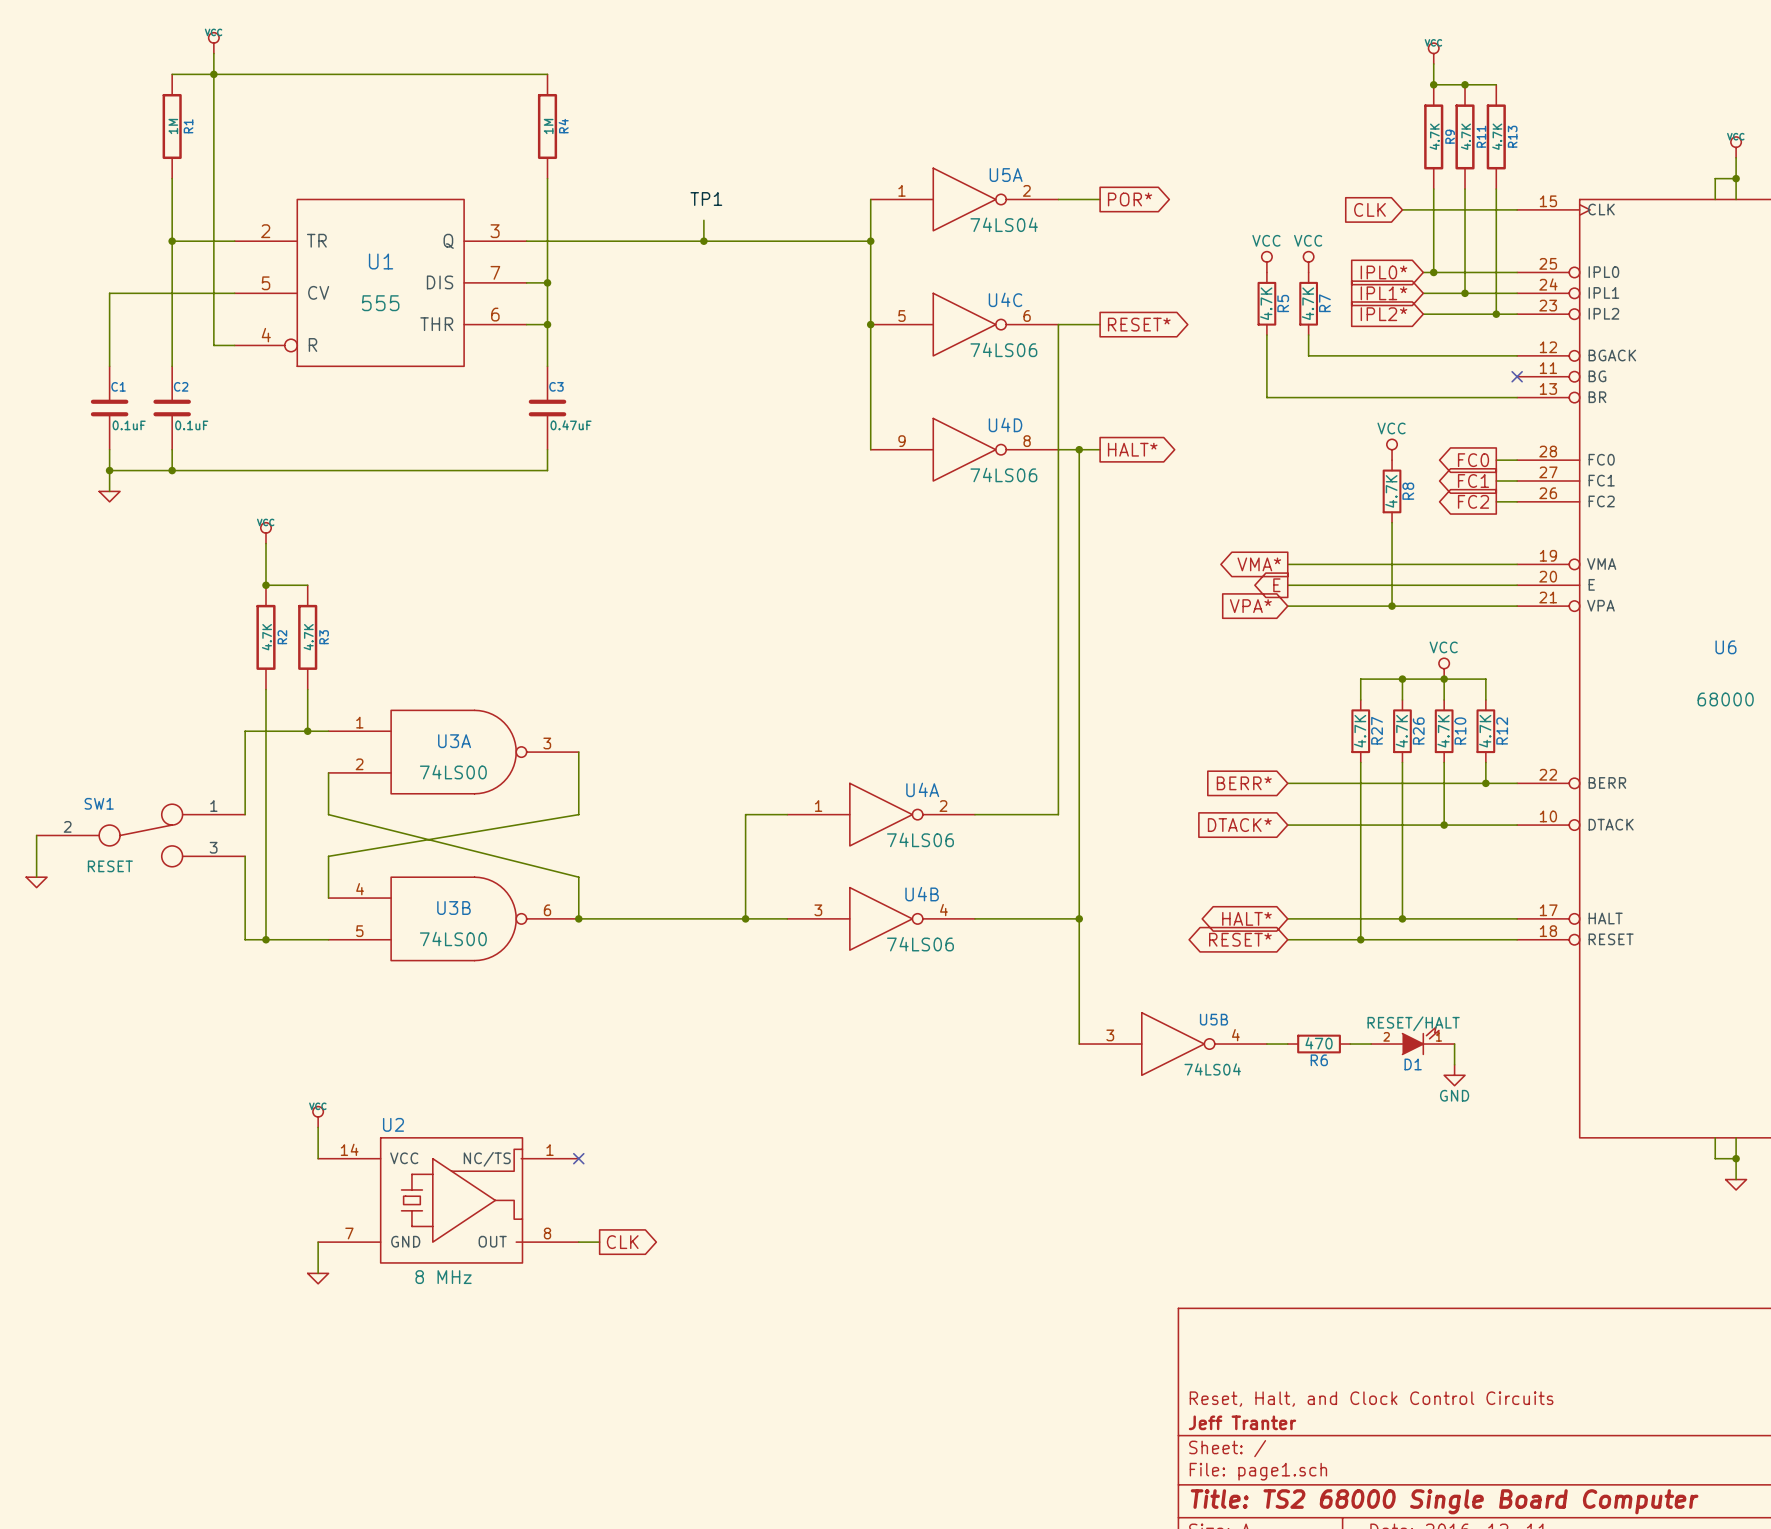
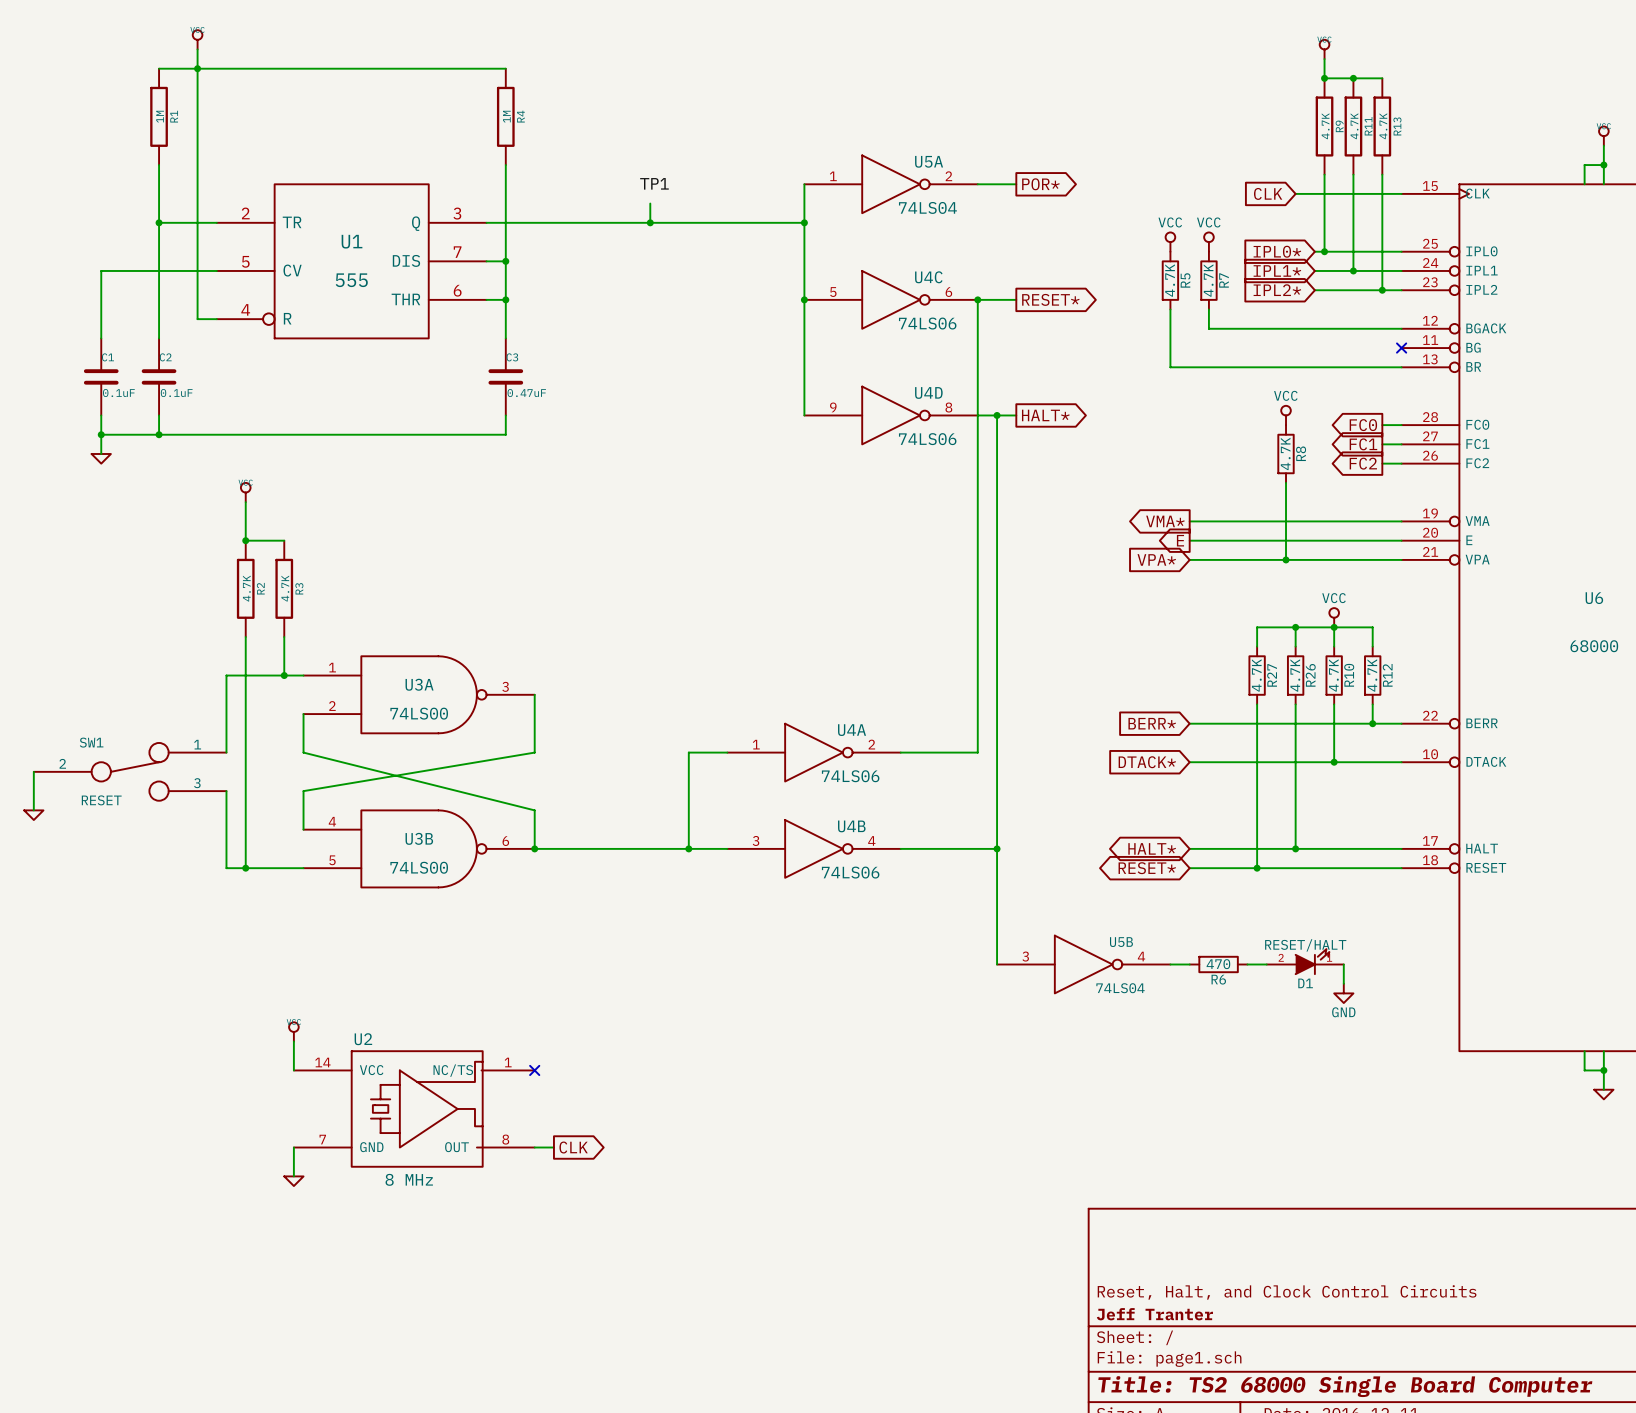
junction: none -> (977, 299)

